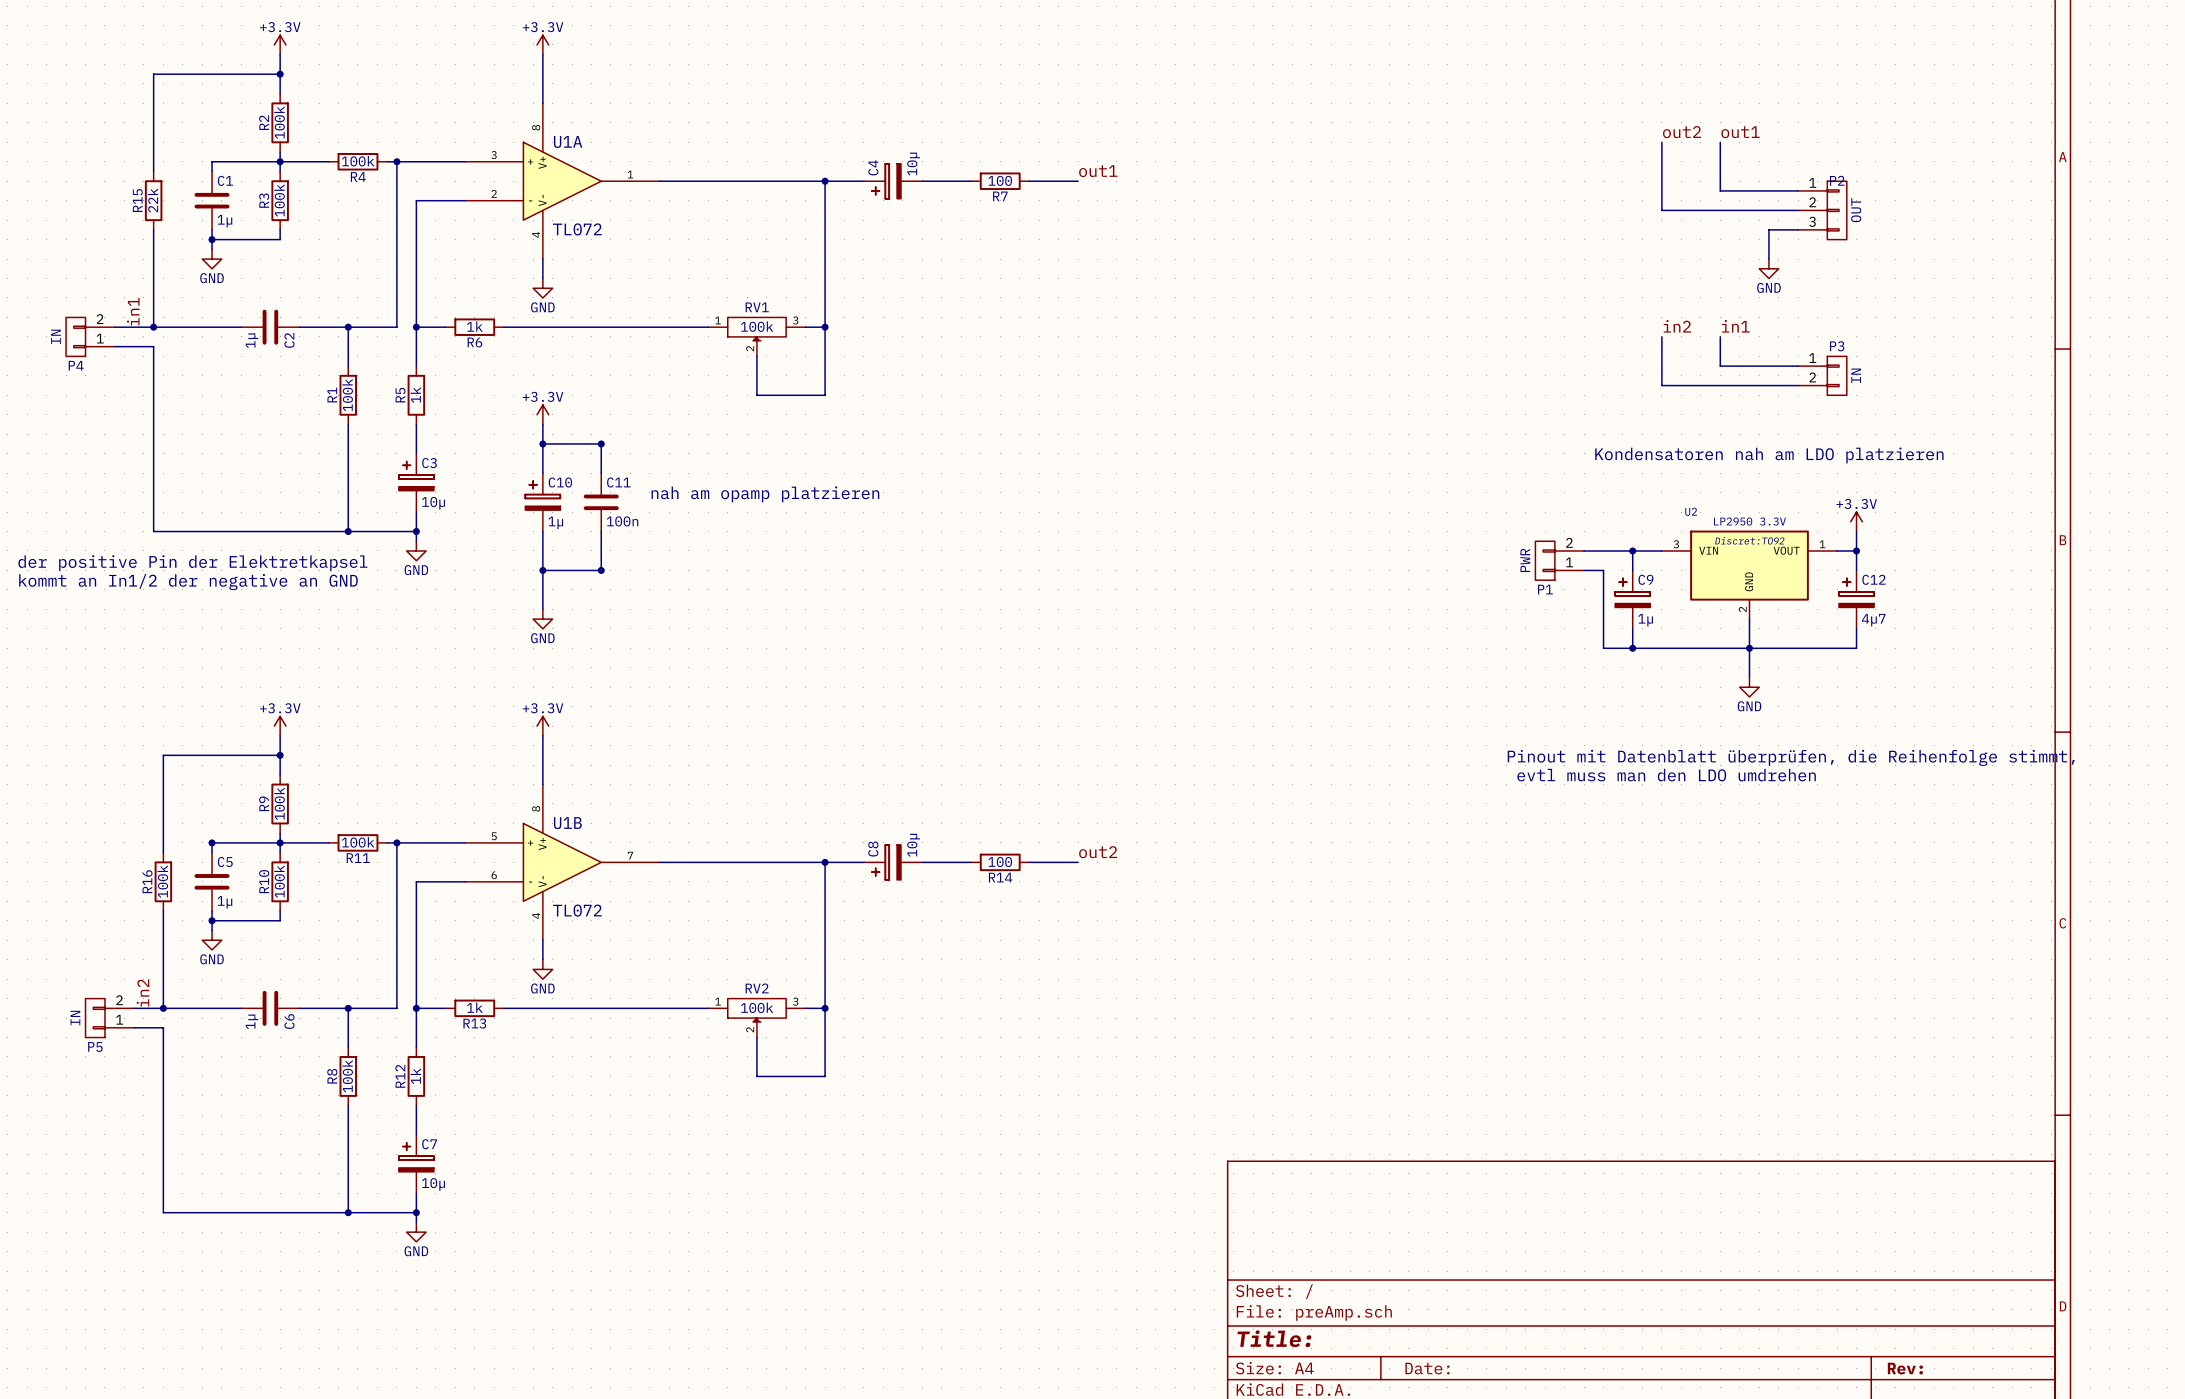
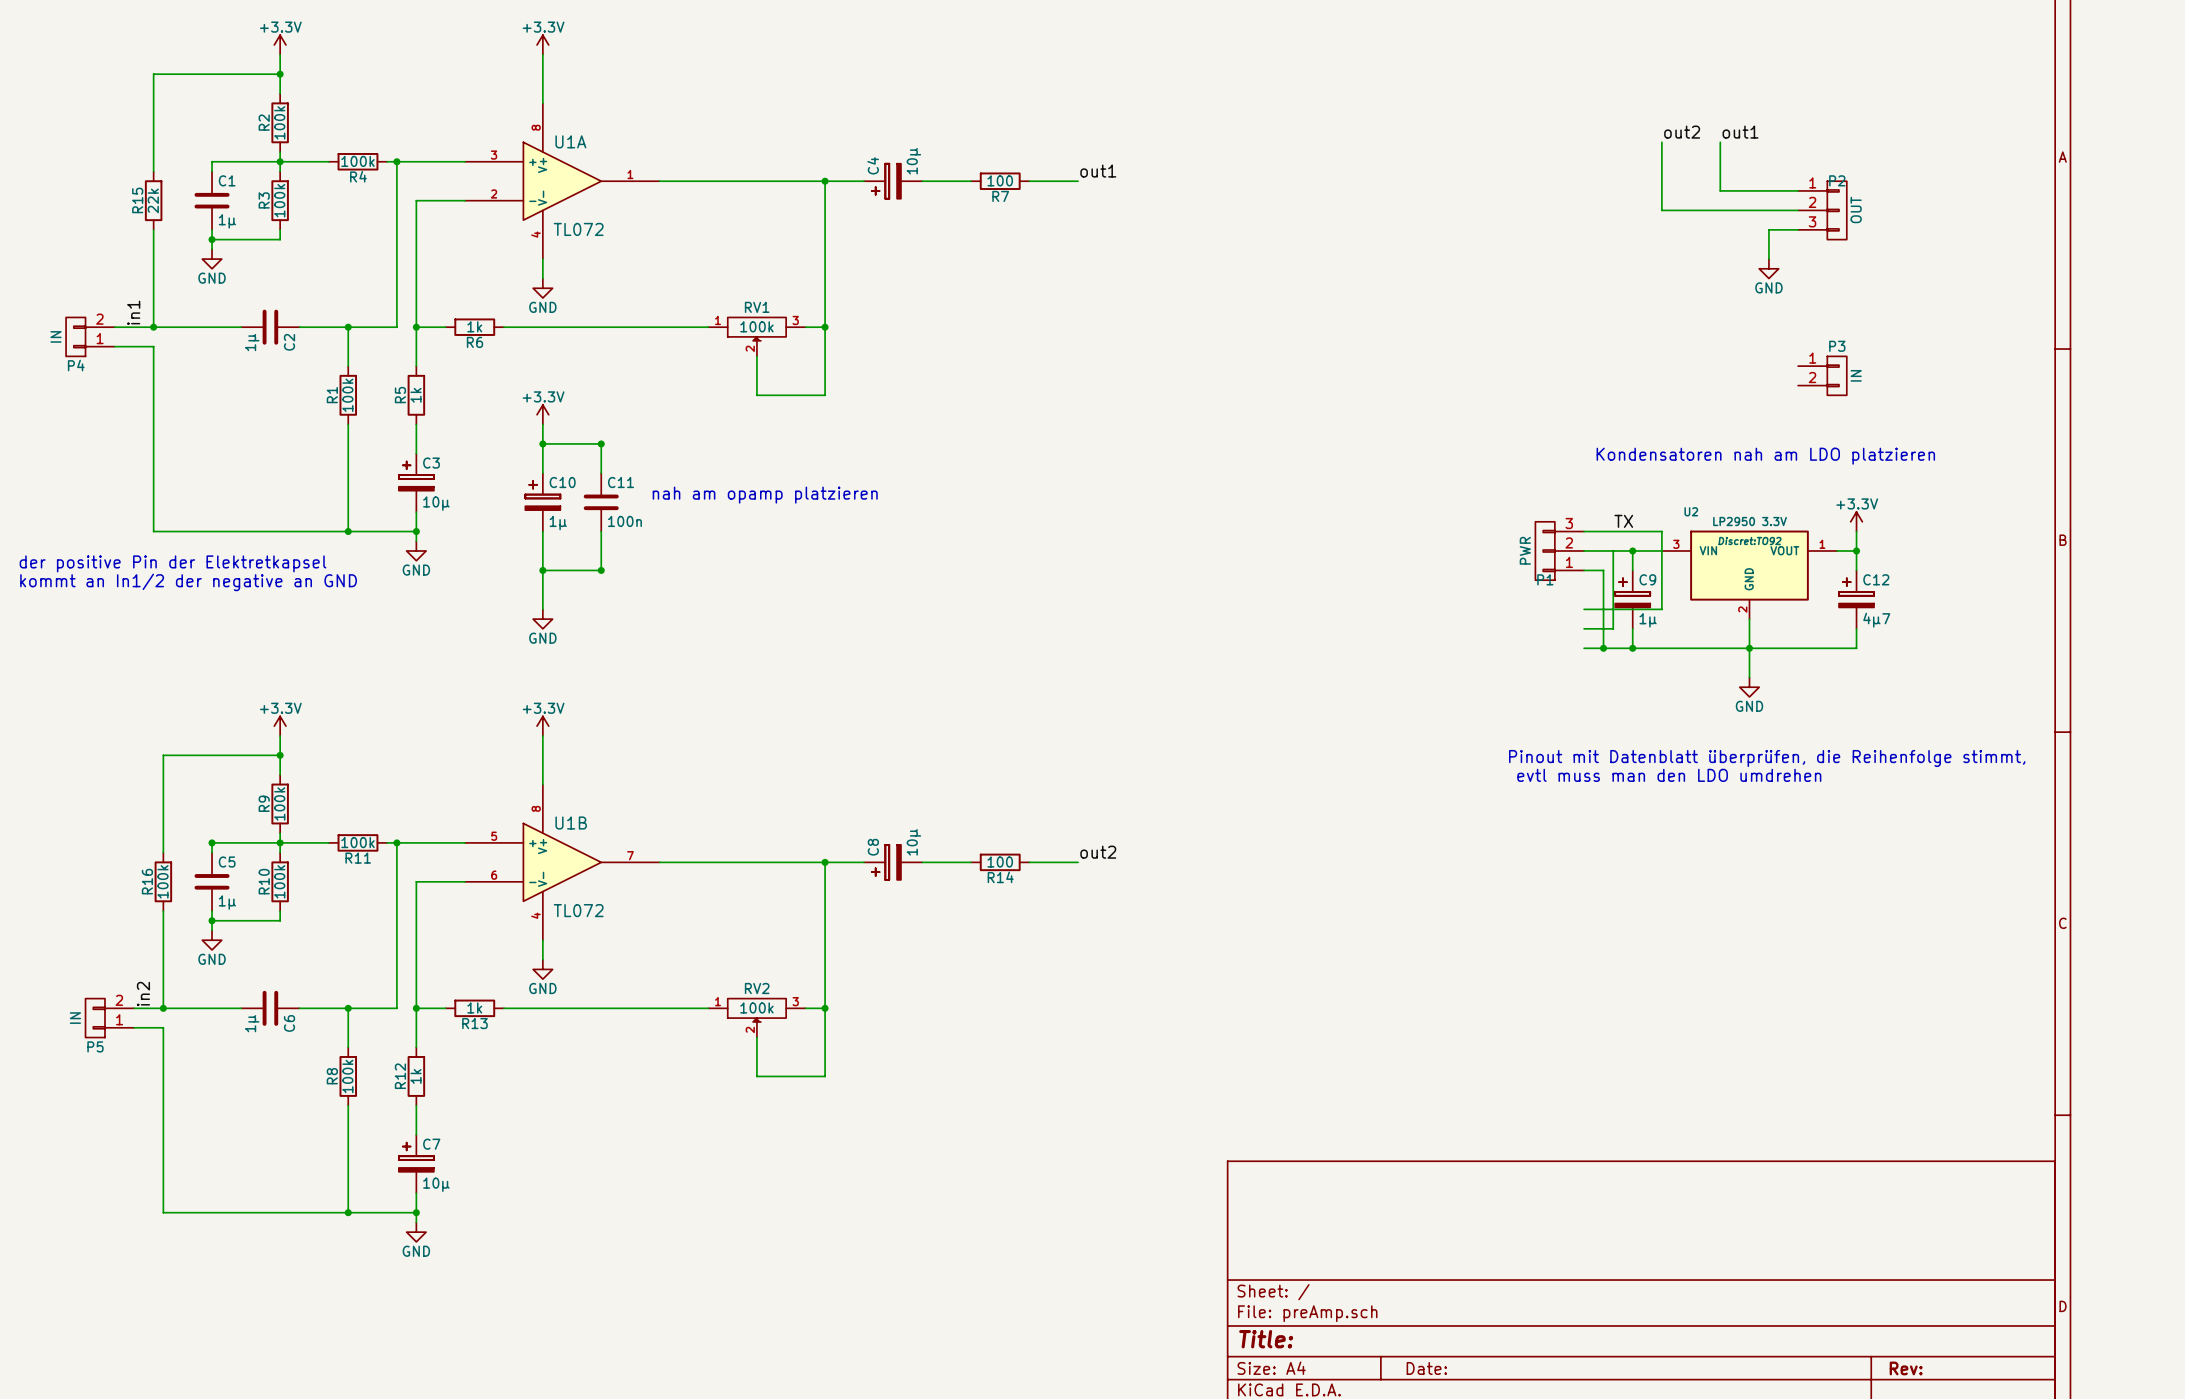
label: in2 (1677, 326) -> none
label: in1 (1735, 326) -> none
wire: (1661, 336) (1661, 385) (1798, 385) -> none
wire: (1720, 336) (1720, 366) (1798, 366) -> none
label: none -> TX (1623, 521)
wire: none -> (1584, 531) (1661, 531) (1661, 609) (1584, 609)
P1 symbol: [1535, 541, 1585, 581] -> [1535, 521, 1585, 581]
wire: none -> (1613, 550) (1613, 628) (1584, 628)
wire: none -> (1584, 648) (1603, 648)
junction: none -> (1603, 648)

